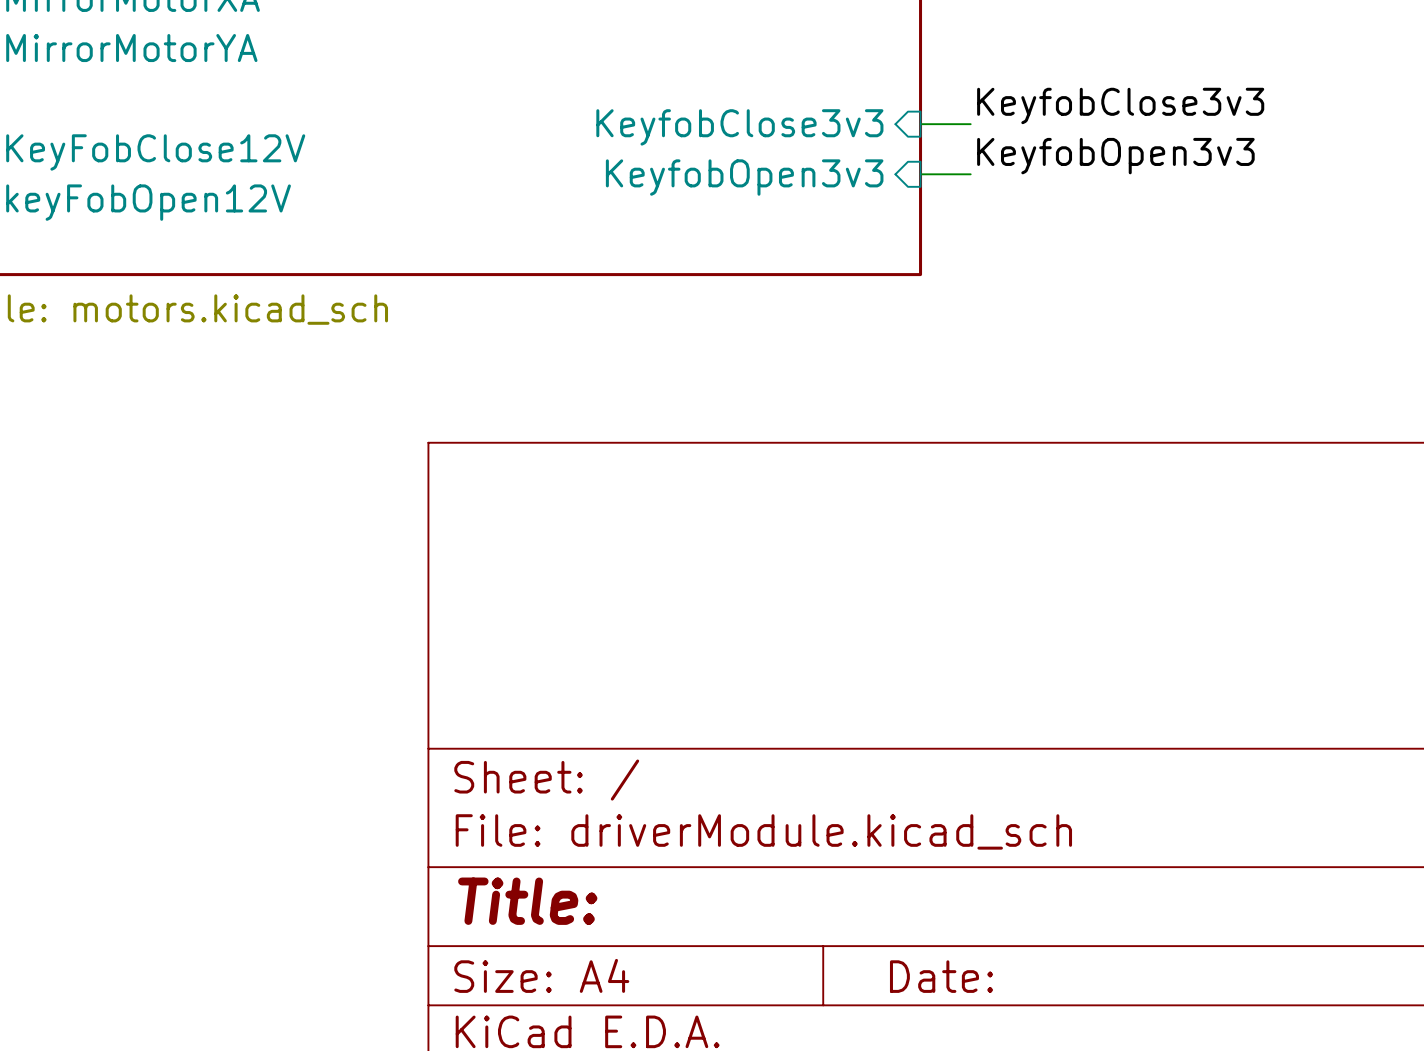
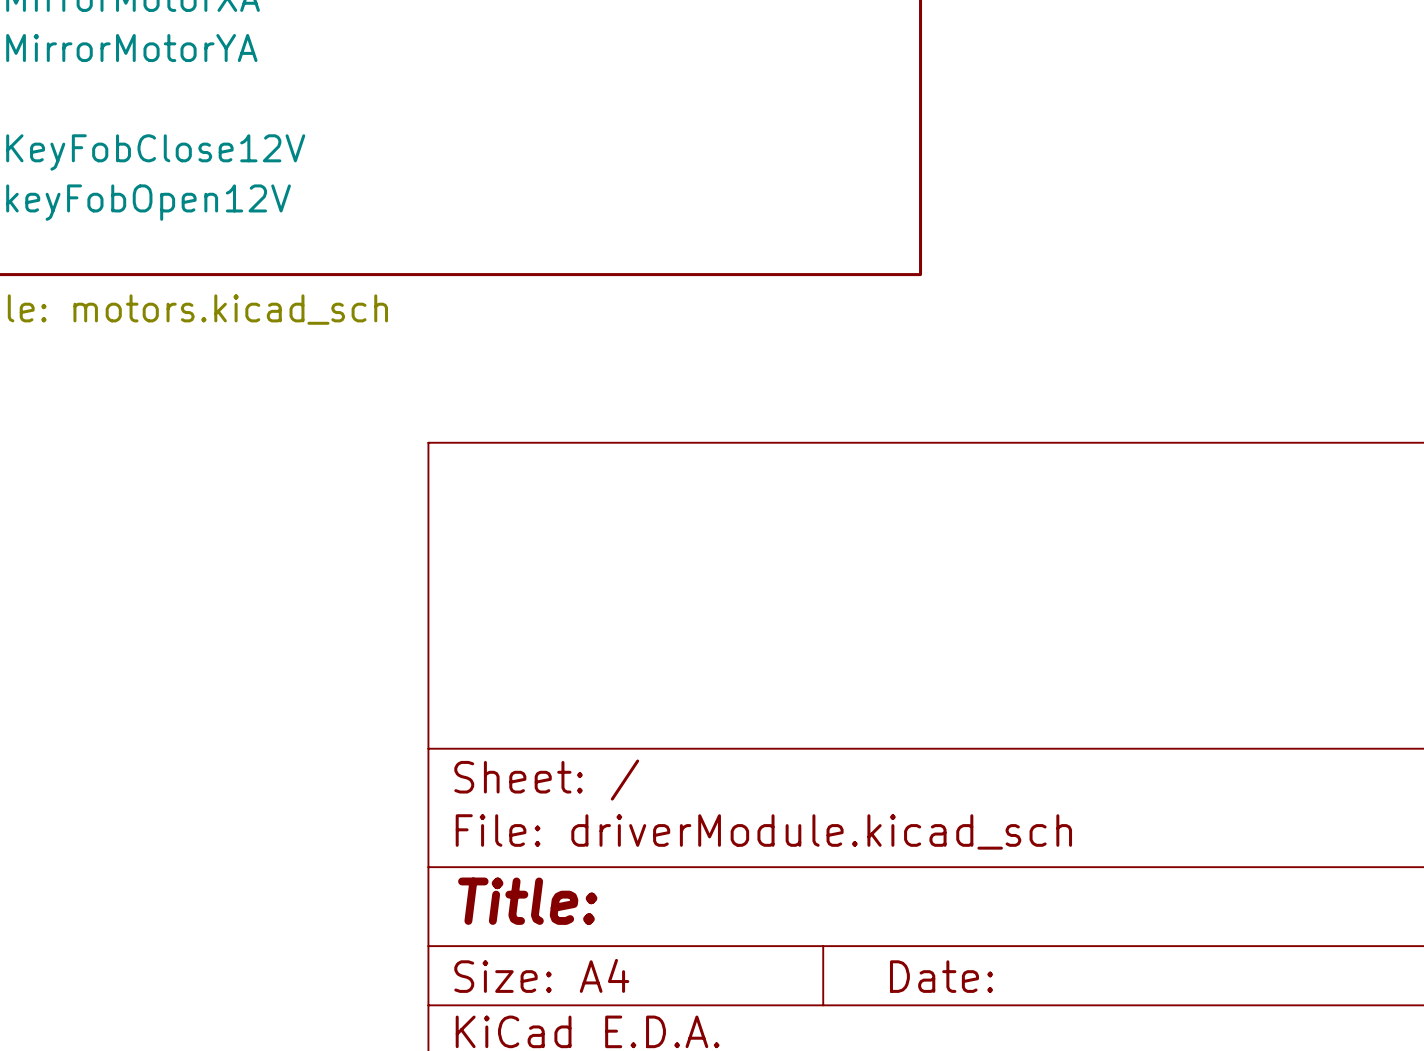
label: KeyfobClose3v3 (1120, 105) -> none
wire: (920, 124) (970, 124) -> none
sheet pin: KeyfobClose3v3 (739, 127) -> none
label: KeyfobOpen3v3 (1115, 156) -> none
wire: (920, 174) (970, 174) -> none
sheet pin: KeyfobOpen3v3 (744, 177) -> none

